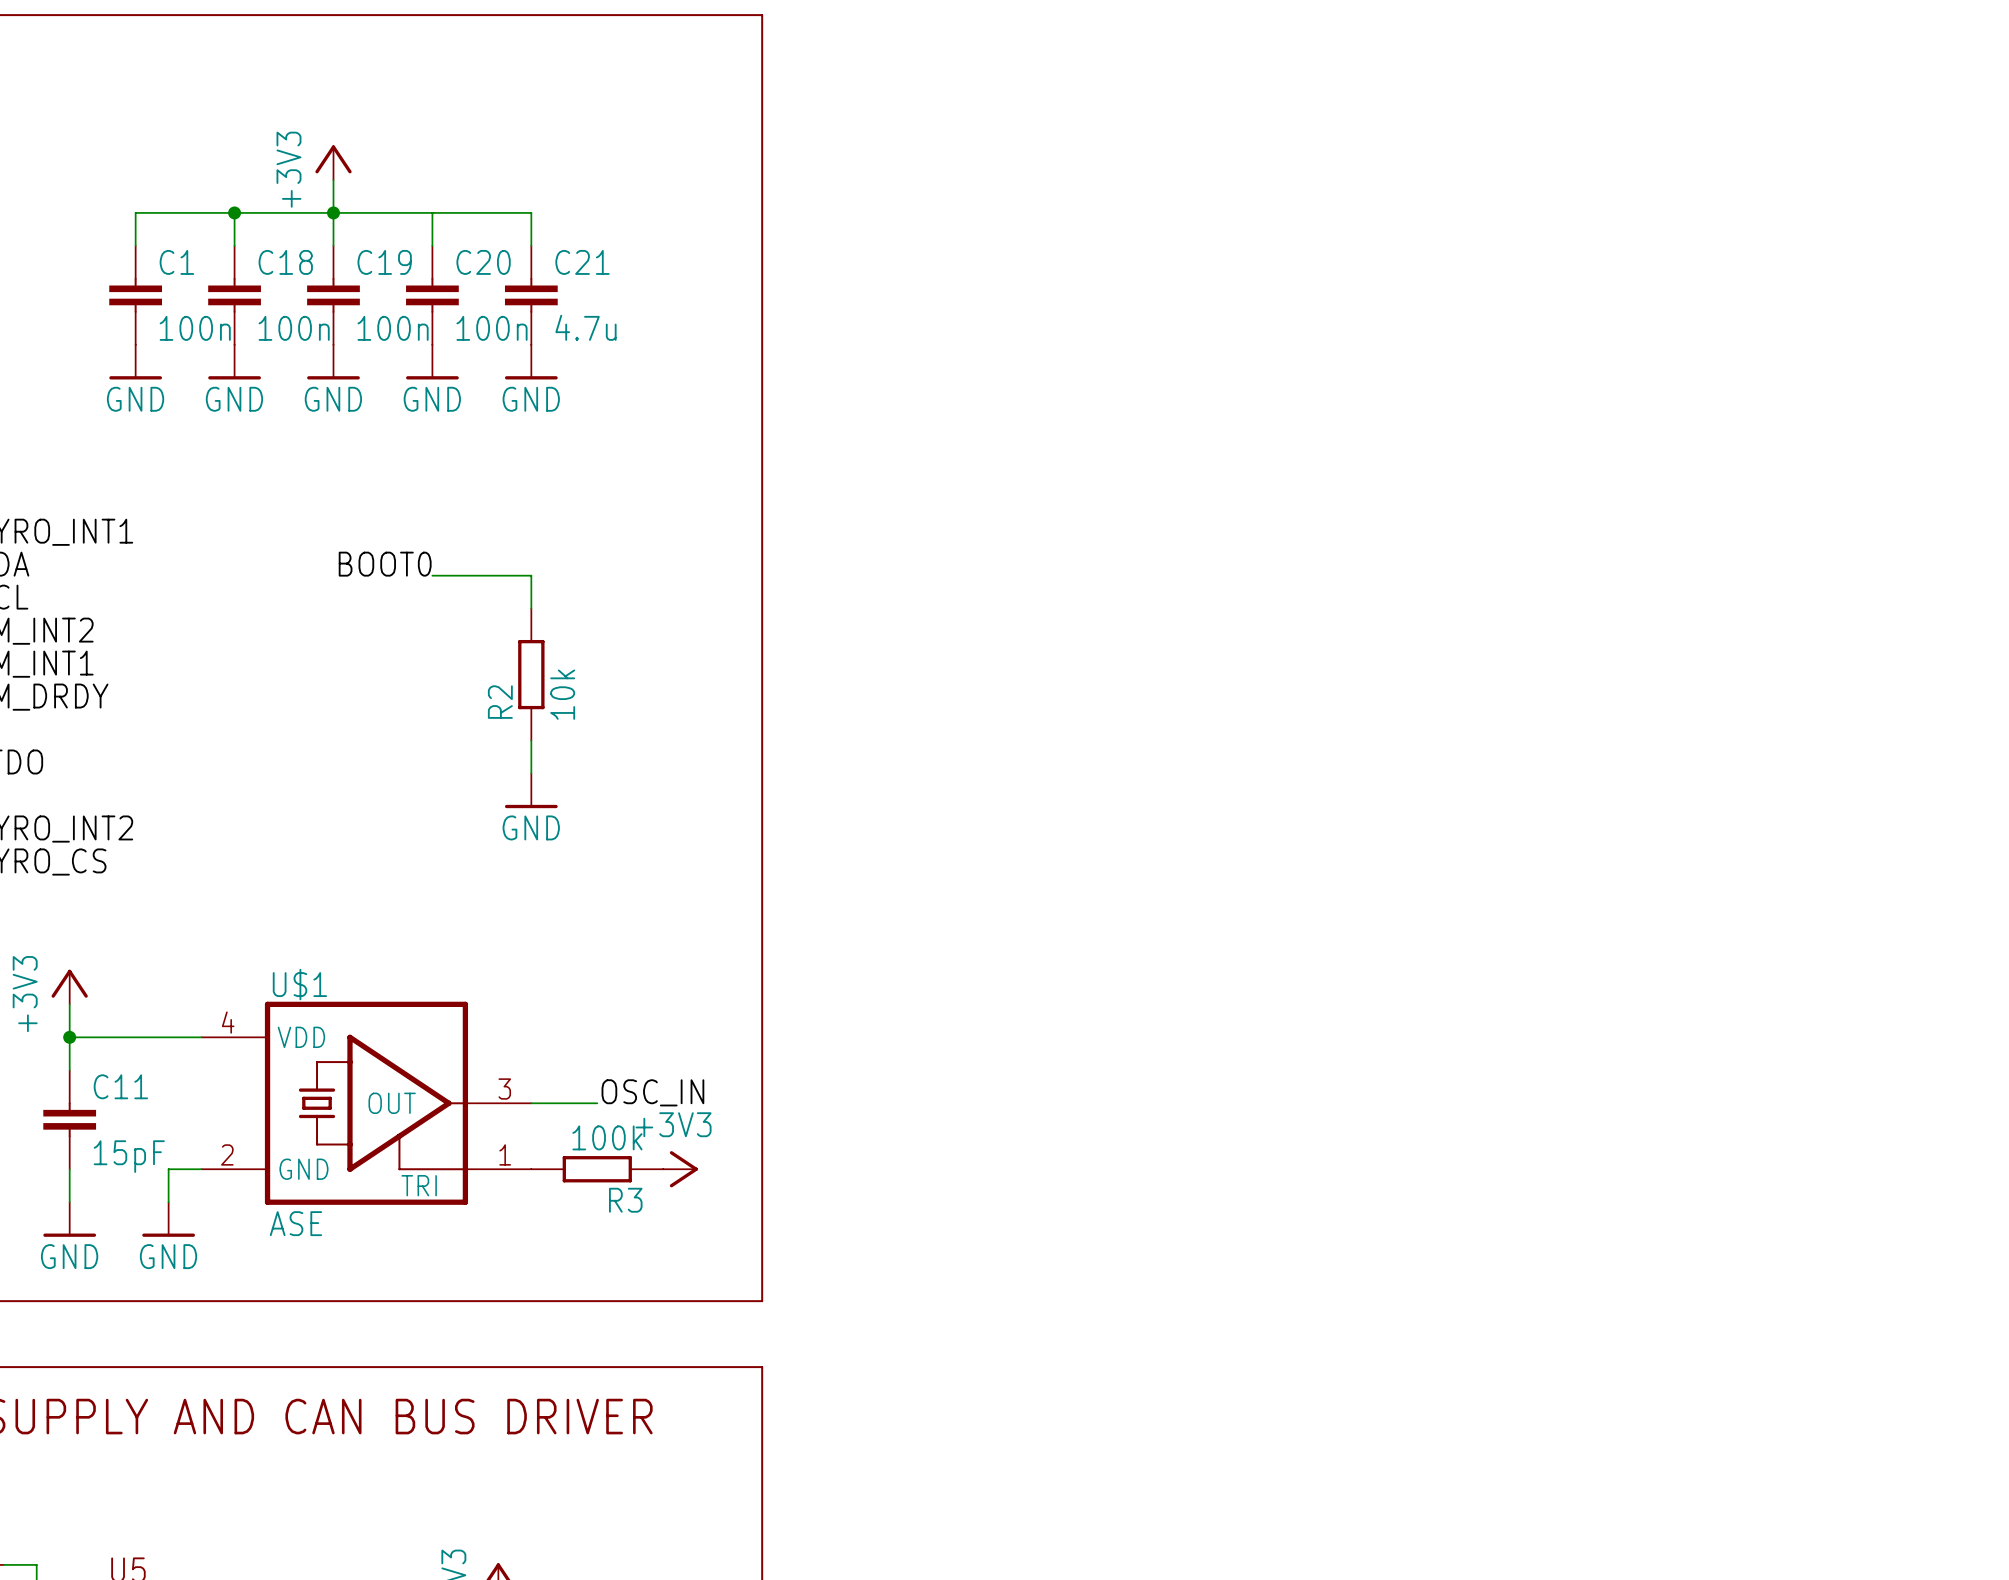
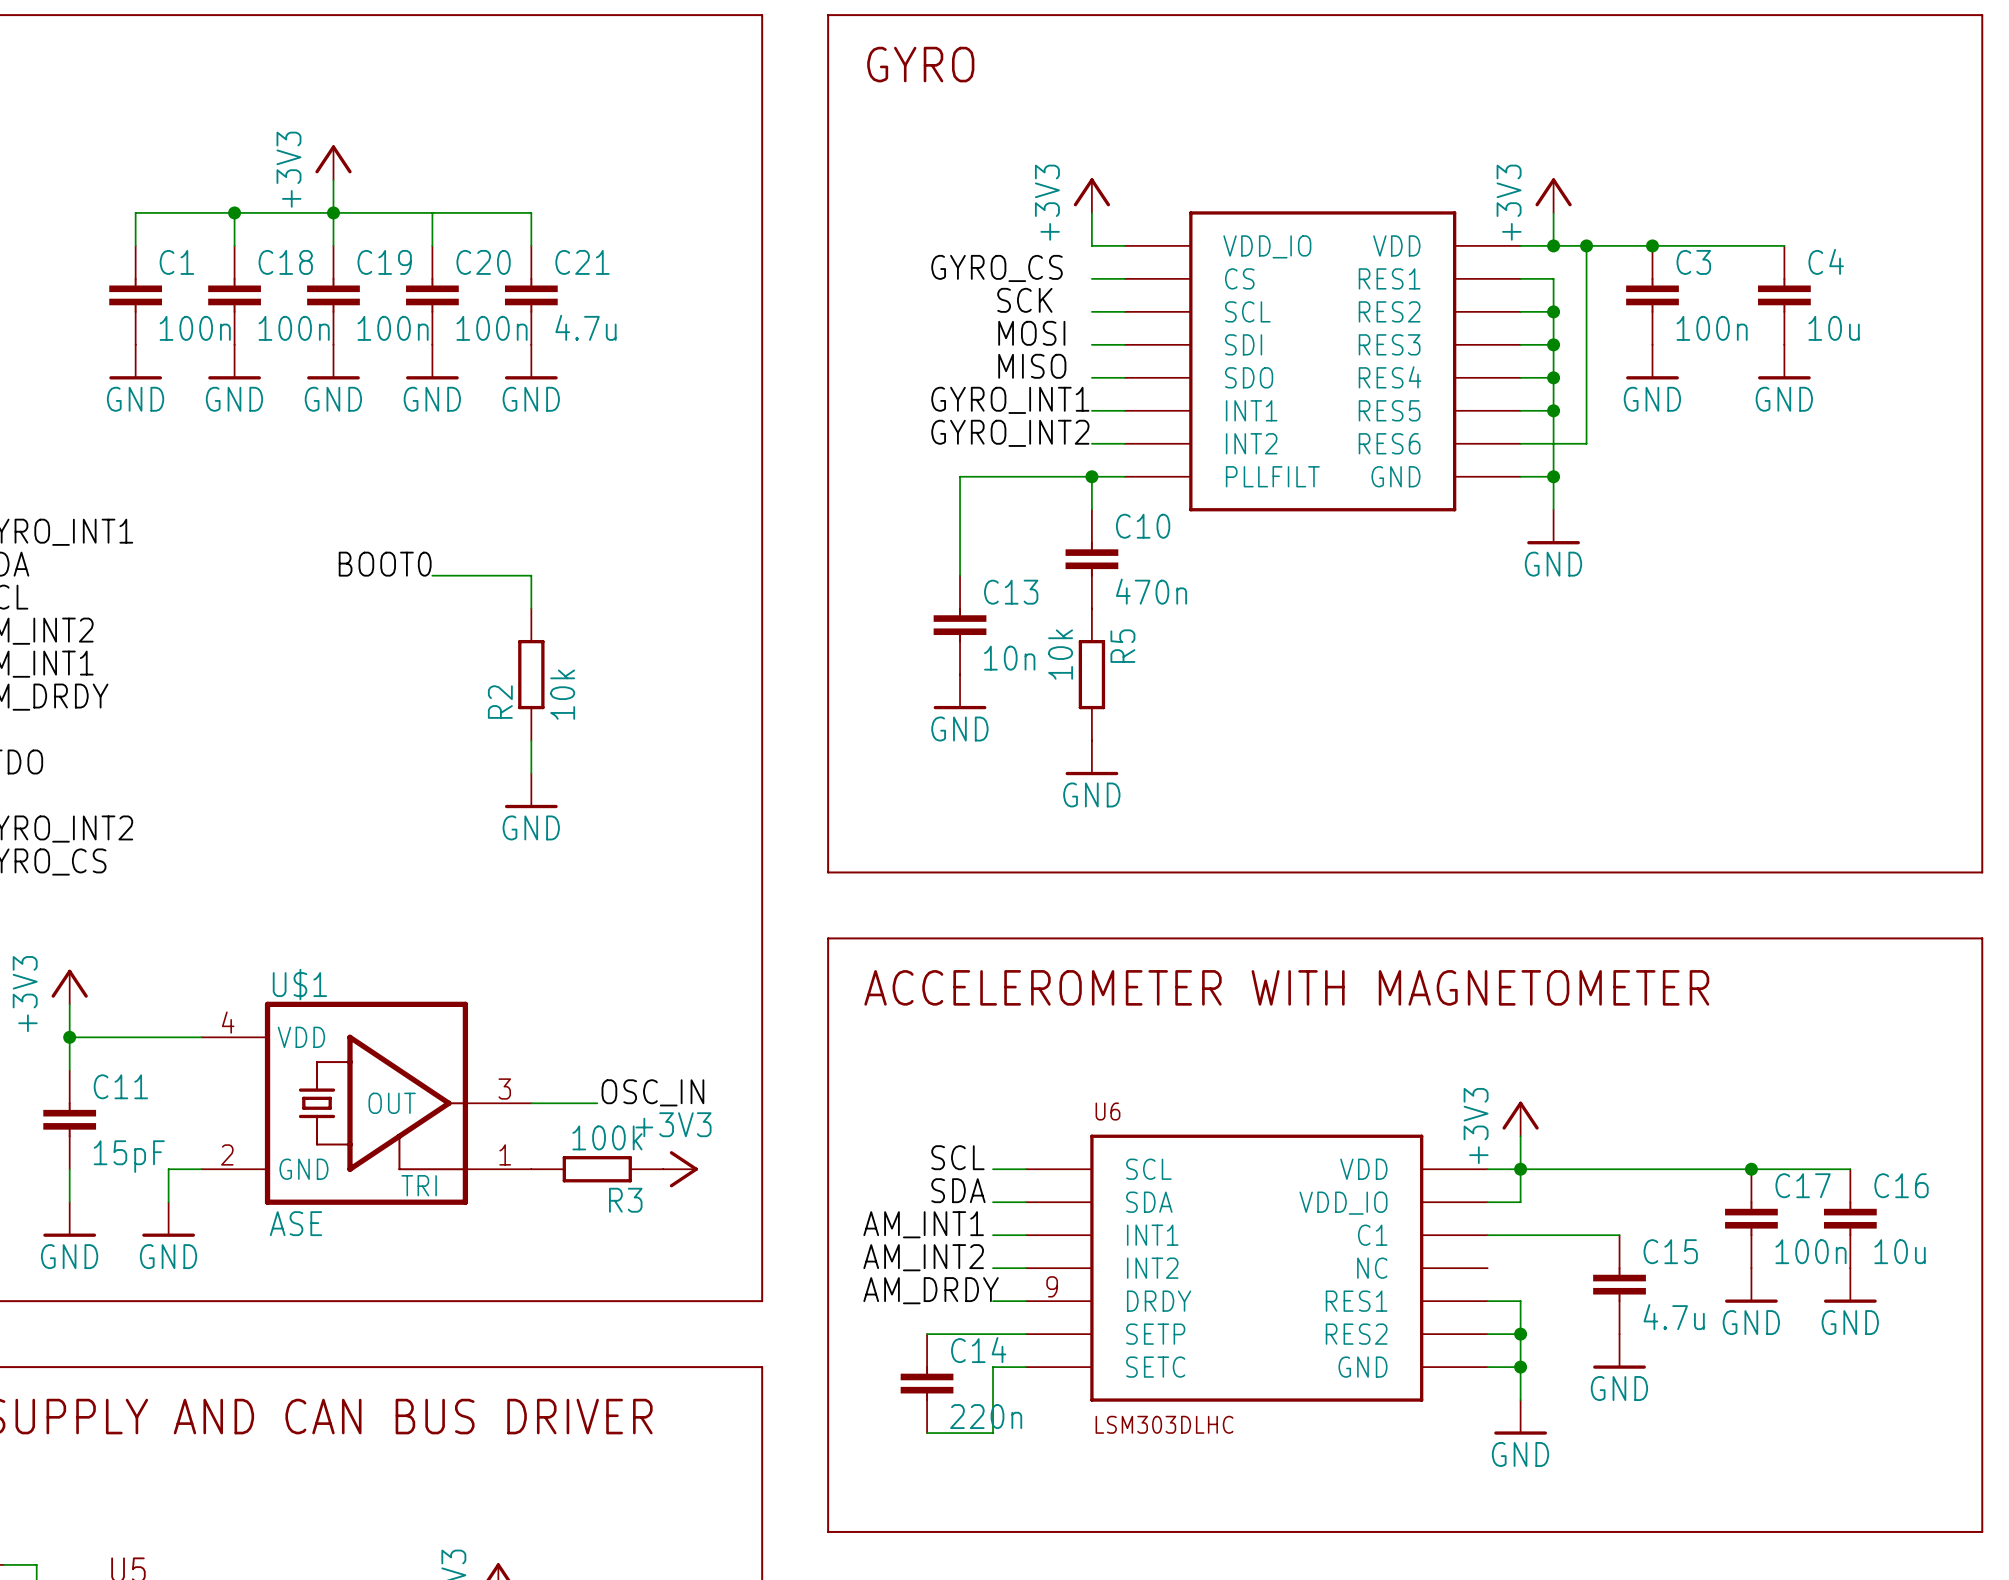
line: none -> (828, 15) (828, 872) (1982, 872) (1982, 15) (828, 15)
text: none -> GYRO (920, 64)
power symbol: none -> +3V3 (1091, 195)
power symbol: none -> +3V3 (1553, 195)
wire: none -> (1091, 212) (1091, 245) (1124, 245)
wire: none -> (1553, 212) (1553, 245)
wire: none -> (1520, 245) (1784, 245)
junction: none -> (1553, 245)
wire: none -> (1586, 245) (1586, 443) (1520, 443)
junction: none -> (1586, 245)
junction: none -> (1652, 245)
label: none -> GYRO_CS (997, 268)
wire: none -> (1091, 278) (1124, 278)
wire: none -> (1520, 278) (1553, 278) (1553, 509)
C3: none -> 100n (1652, 295)
C4: none -> 10u (1784, 295)
label: none -> SCK (1024, 300)
wire: none -> (1091, 311) (1124, 311)
wire: none -> (1520, 311) (1553, 311)
junction: none -> (1553, 311)
label: none -> MOSI (1031, 333)
wire: none -> (1091, 344) (1124, 344)
wire: none -> (1520, 344) (1553, 344)
junction: none -> (1553, 344)
part: none -> (1322, 361)
power symbol: none -> GND (1652, 362)
power symbol: none -> GND (1784, 362)
label: none -> MISO (1032, 366)
wire: none -> (1091, 377) (1124, 377)
wire: none -> (1520, 377) (1553, 377)
junction: none -> (1553, 377)
label: none -> GYRO_INT1 (1010, 400)
wire: none -> (1091, 410) (1124, 410)
wire: none -> (1520, 410) (1553, 410)
junction: none -> (1553, 410)
label: none -> GYRO_INT2 (1010, 433)
wire: none -> (1091, 443) (1124, 443)
wire: none -> (1091, 476) (1091, 509)
junction: none -> (1091, 476)
wire: none -> (1124, 476) (960, 476) (960, 575)
wire: none -> (1520, 476) (1553, 476)
junction: none -> (1553, 476)
power symbol: none -> GND (1553, 527)
C10: none -> 470n (1091, 559)
C13: none -> 10n (960, 625)
R5: none -> 10k (1091, 674)
power symbol: none -> GND (960, 691)
power symbol: none -> GND (1091, 757)
line: none -> (828, 938) (1982, 938) (1982, 1531) (828, 1531) (828, 938)
text: none -> ACCELEROMETER WITH MAGNETOMETER (1286, 987)
power symbol: none -> +3V3 (1520, 1118)
wire: none -> (1520, 1136) (1520, 1202) (1487, 1202)
label: none -> SCL (957, 1157)
wire: none -> (993, 1169) (1025, 1169)
wire: none -> (1487, 1169) (1850, 1169)
junction: none -> (1520, 1169)
junction: none -> (1751, 1169)
label: none -> SDA (958, 1190)
wire: none -> (993, 1202) (1025, 1202)
C17: none -> 100n (1751, 1218)
C16: none -> 10u (1850, 1218)
label: none -> AM_INT1 (923, 1224)
wire: none -> (993, 1235) (1025, 1235)
wire: none -> (1487, 1235) (1619, 1235)
label: none -> AM_INT2 (923, 1257)
wire: none -> (993, 1268) (1025, 1268)
U6: none -> LSM303DLHC (1256, 1268)
C15: none -> 4.7u (1619, 1284)
power symbol: none -> GND (1751, 1285)
power symbol: none -> GND (1850, 1285)
label: none -> AM_DRDY (931, 1290)
wire: none -> (993, 1301) (1025, 1301)
wire: none -> (1487, 1301) (1520, 1301) (1520, 1400)
wire: none -> (927, 1334) (1025, 1334)
wire: none -> (1487, 1334) (1520, 1334)
junction: none -> (1520, 1334)
power symbol: none -> GND (1619, 1351)
wire: none -> (1025, 1367) (993, 1367) (993, 1433) (927, 1433)
wire: none -> (1487, 1367) (1520, 1367)
junction: none -> (1520, 1367)
C14: none -> 220n (927, 1383)
power symbol: none -> GND (1520, 1417)

